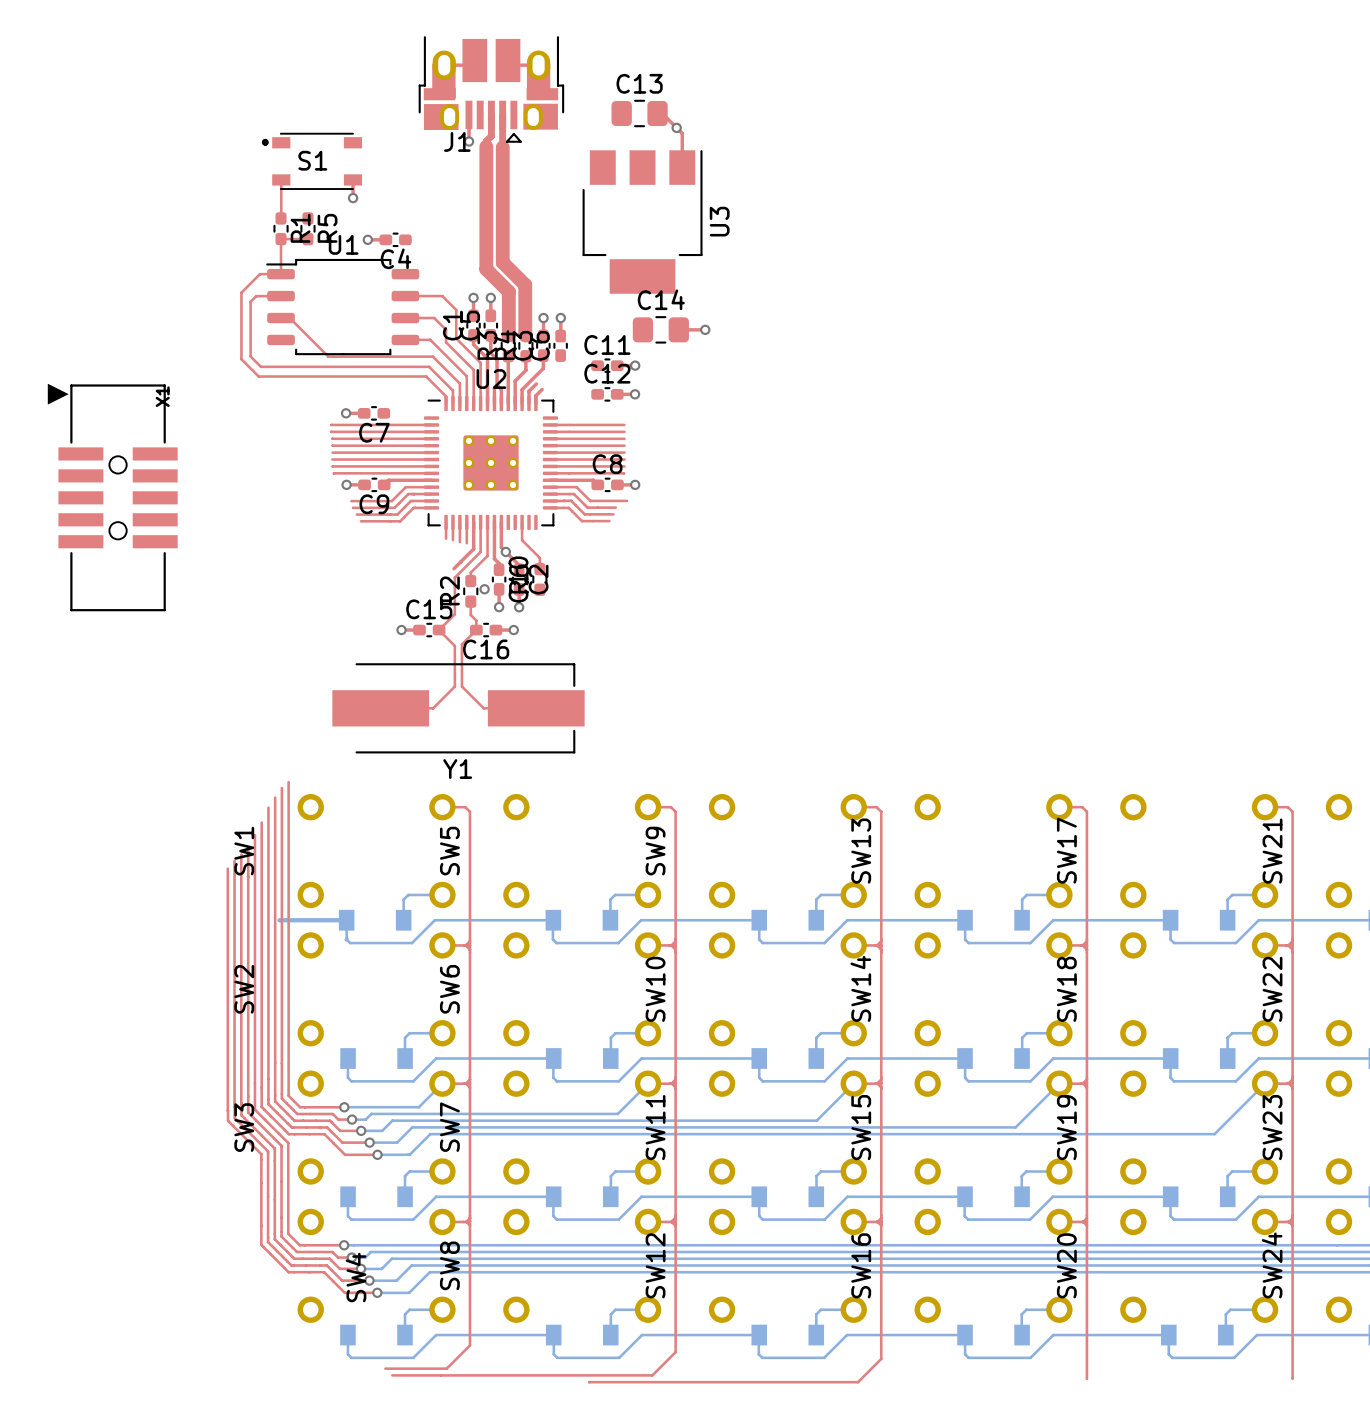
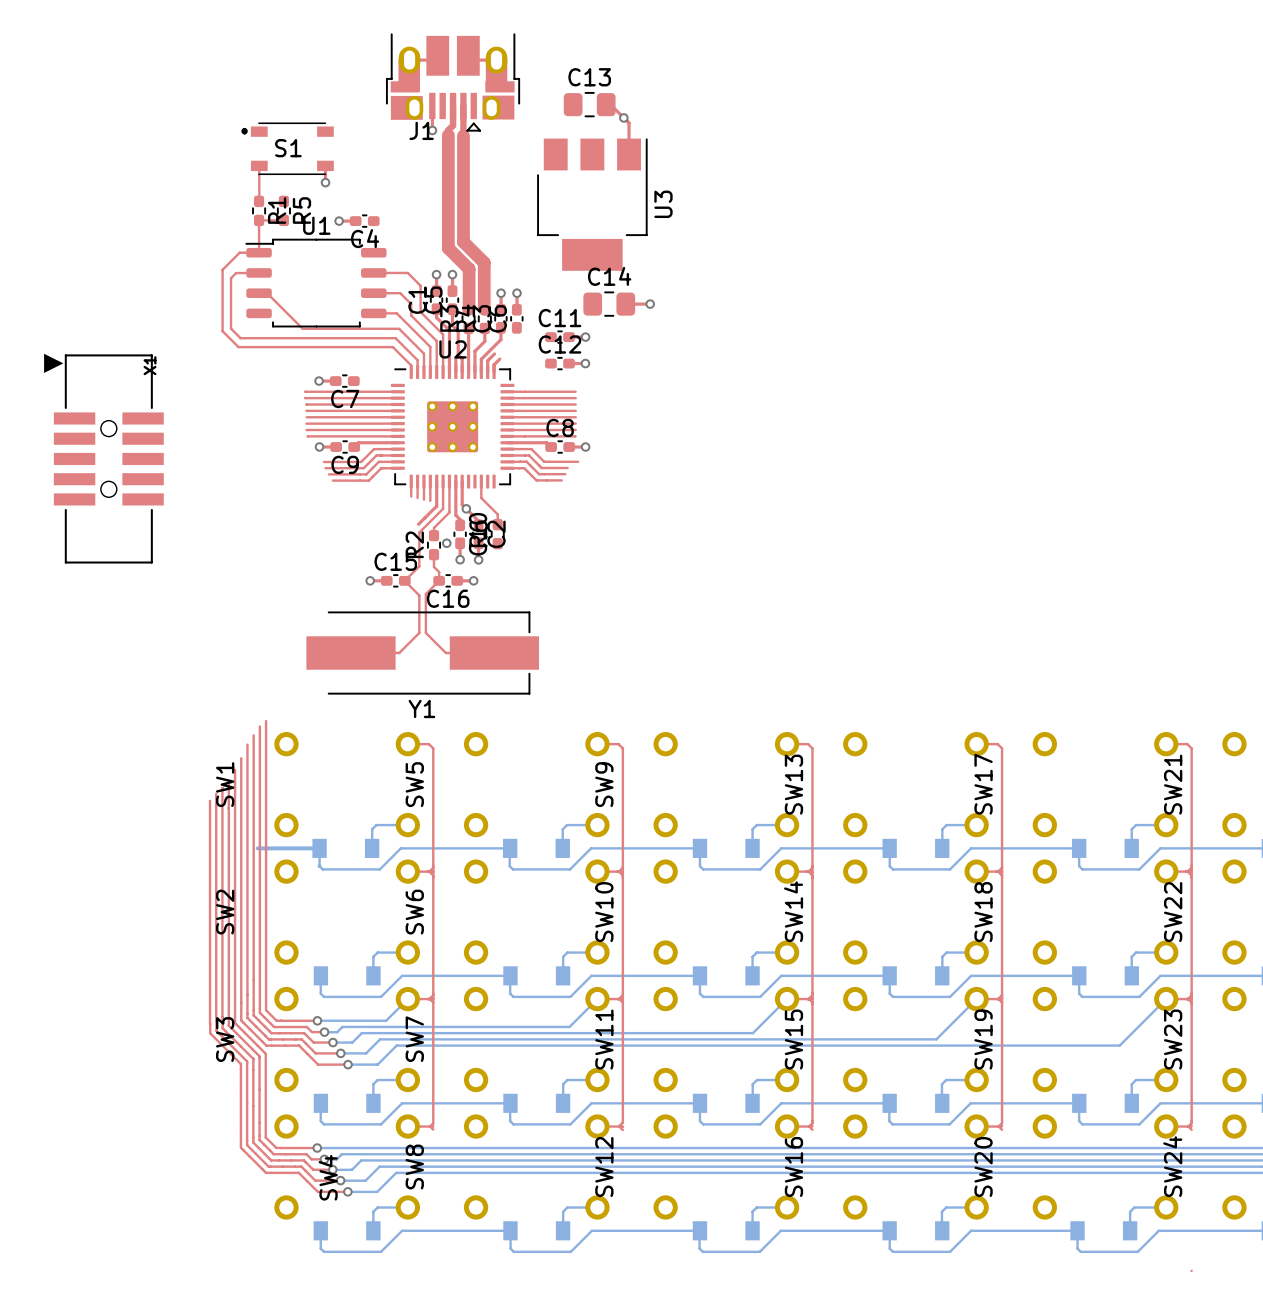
top track: (469, 1218) (469, 1345) (446, 1368) (385, 1368) -> none
top track: (675, 1218) (675, 1352) (652, 1375) -> none
top track: (881, 1218) (881, 1358) (858, 1382) (589, 1382) -> none
top track: (1086, 1218) (1086, 1378) -> none
top track: (1292, 1218) (1292, 1378) -> none
top track: (392, 1375) (652, 1375) -> none

